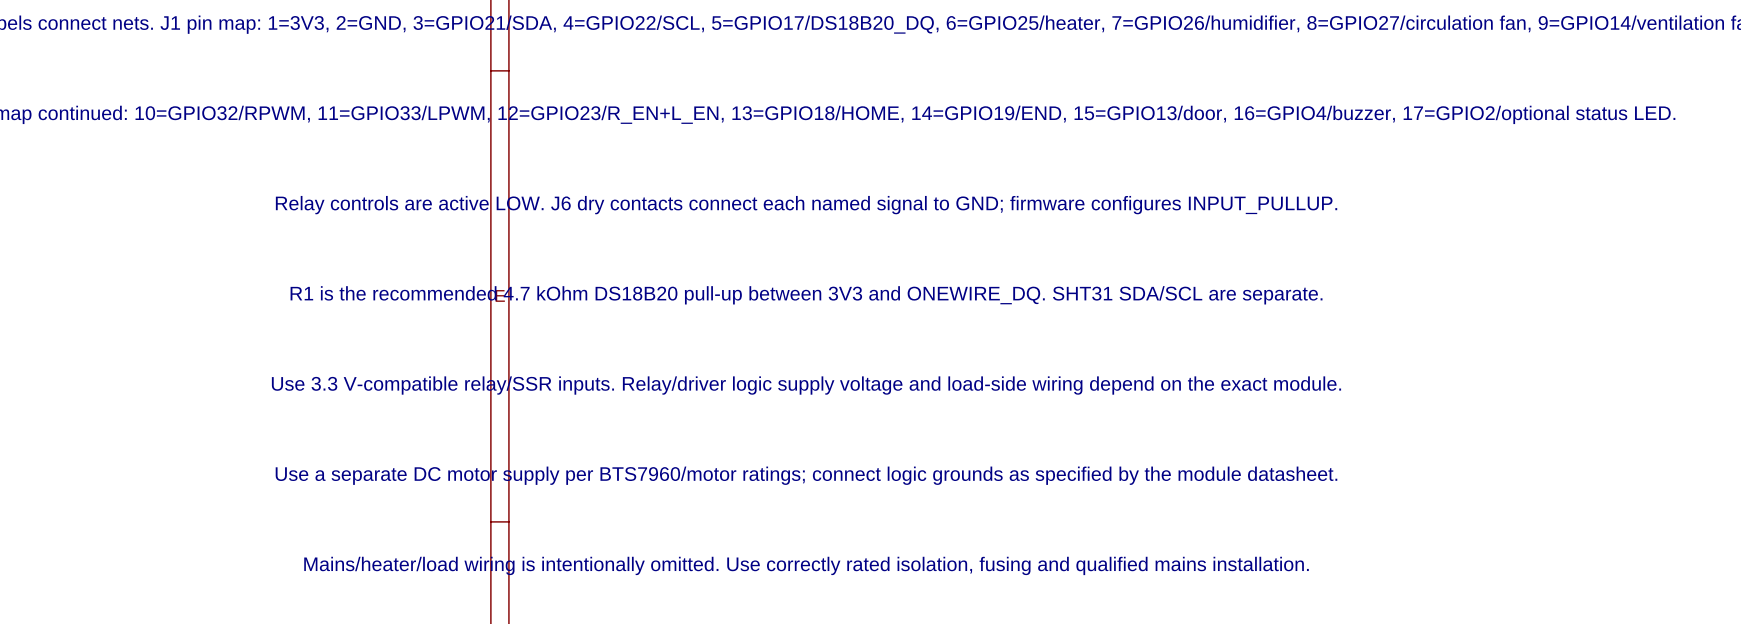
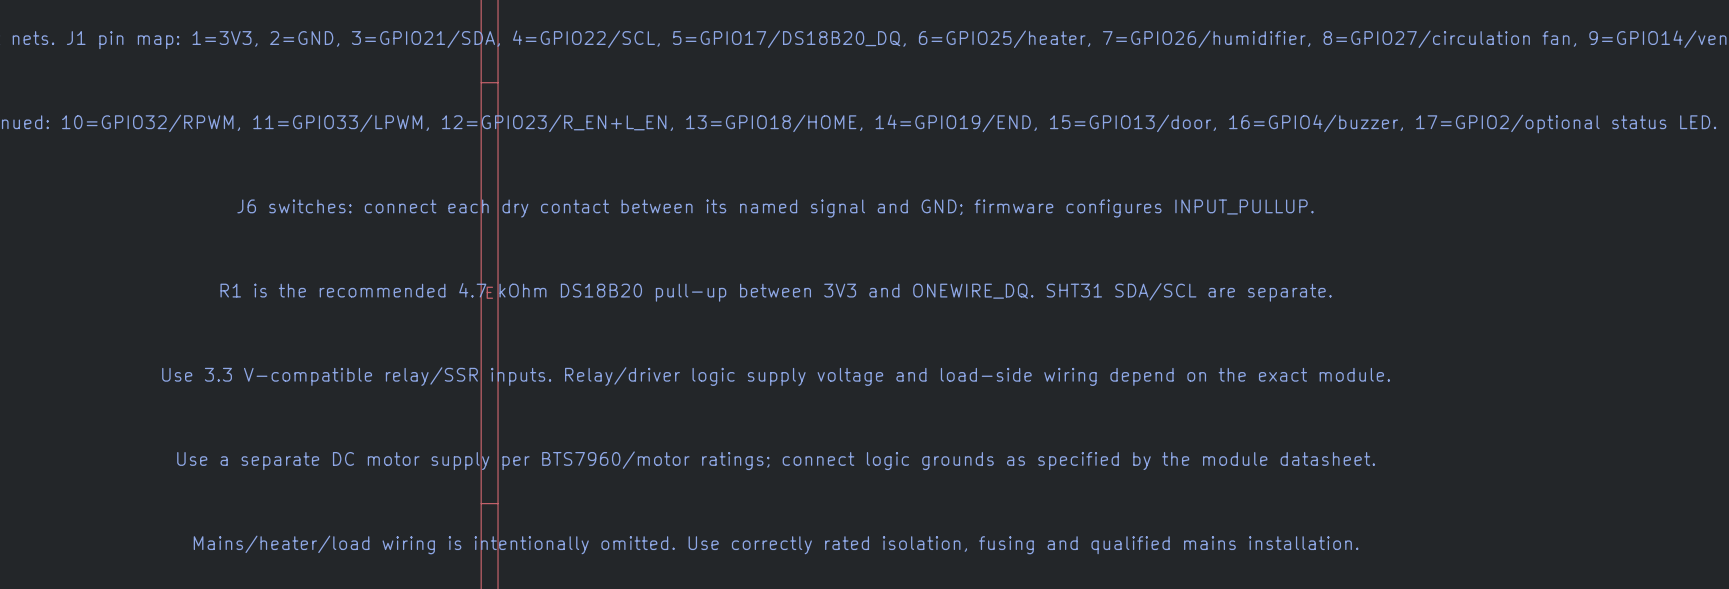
text: Relay controls are active LOW. J6 dry contacts connect each named signal to GND; firmware configures INPUT_PULLUP. (806, 205) -> J6 switches: connect each dry contact between its named signal and GND; firmware configures INPUT_PULLUP. (775, 208)

